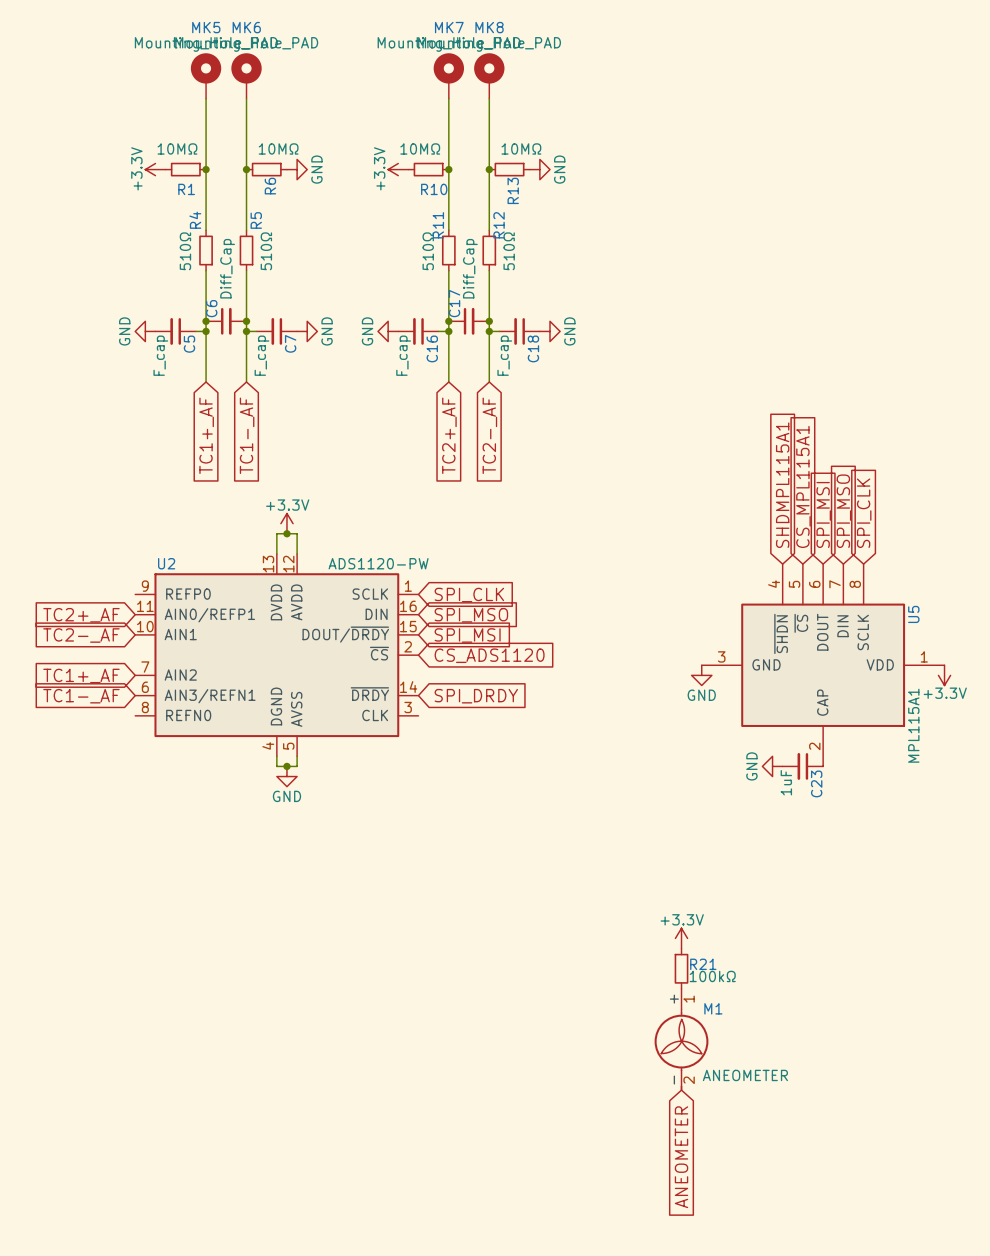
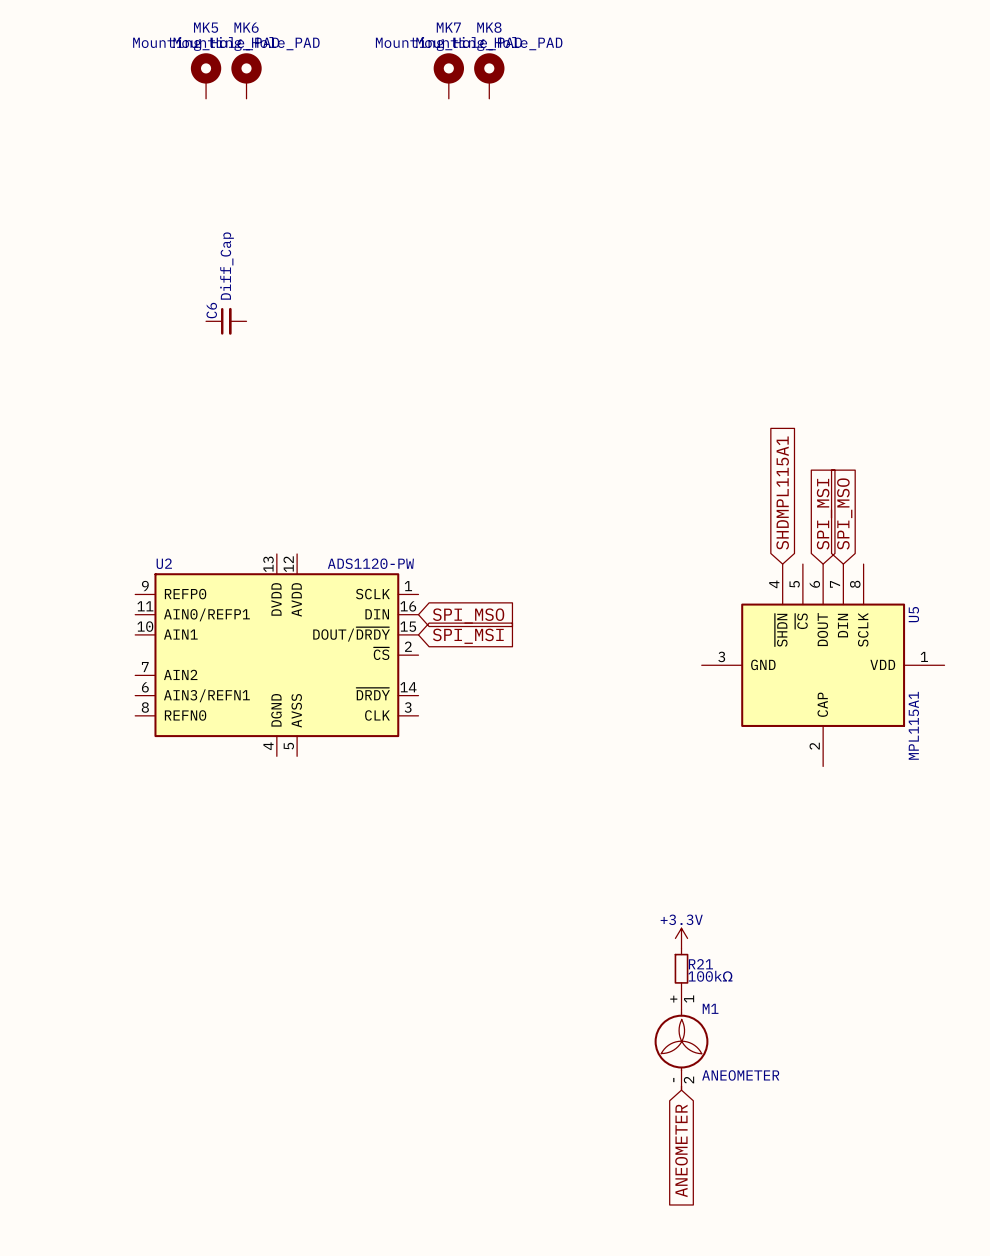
wire: (206, 98) (206, 230) -> none
wire: (246, 98) (246, 230) -> none
wire: (448, 98) (448, 230) -> none
wire: (489, 98) (489, 230) -> none
power symbol: +3.3V (155, 169) -> none
R1: 10MΩ (185, 169) -> none
junction: (206, 169) -> none
junction: (246, 169) -> none
R6: 10MΩ (266, 169) -> none
power symbol: GND (297, 169) -> none
power symbol: +3.3V (398, 169) -> none
R10: 10MΩ (428, 169) -> none
junction: (448, 169) -> none
junction: (489, 169) -> none
R13: 10MΩ (509, 169) -> none
power symbol: GND (539, 169) -> none
R4: 510Ω (206, 250) -> none
R5: 510Ω (246, 250) -> none
R11: 510Ω (448, 250) -> none
R12: 510Ω (489, 250) -> none
wire: (206, 270) (206, 382) -> none
wire: (246, 270) (246, 382) -> none
wire: (448, 270) (448, 382) -> none
wire: (489, 270) (489, 382) -> none
junction: (206, 321) -> none
junction: (246, 321) -> none
junction: (448, 321) -> none
C17: Diff_Cap (469, 321) -> none
junction: (489, 321) -> none
power symbol: GND (145, 331) -> none
C5: F_cap (175, 331) -> none
wire: (195, 331) (206, 331) -> none
junction: (206, 331) -> none
wire: (246, 331) (256, 331) -> none
junction: (246, 331) -> none
C7: F_cap (276, 331) -> none
power symbol: GND (307, 331) -> none
power symbol: GND (388, 331) -> none
C16: F_cap (418, 331) -> none
wire: (438, 331) (448, 331) -> none
junction: (448, 331) -> none
wire: (489, 331) (499, 331) -> none
junction: (489, 331) -> none
C18: F_cap (519, 331) -> none
power symbol: GND (549, 331) -> none
global label: TC1+_AF (206, 435) -> none
global label: TC1-_AF (247, 435) -> none
global label: TC2+_AF (449, 435) -> none
global label: TC2-_AF (489, 435) -> none
global label: CS_MPL115A1 (803, 486) -> none
global label: SPI_CLK (864, 513) -> none
power symbol: +3.3V (286, 523) -> none
junction: (286, 533) -> none
wire: (276, 553) (276, 533) (297, 533) (297, 553) -> none
global label: SPI_CLK (469, 595) -> none
global label: TC2+_AF (81, 615) -> none
global label: TC2-_AF (81, 635) -> none
global label: CS_ADS1120 (489, 655) -> none
global label: TC1+_AF (81, 675) -> none
power symbol: GND (701, 675) -> none
power symbol: +3.3V (944, 675) -> none
global label: TC1-_AF (81, 696) -> none
global label: SPI_DRDY (476, 696) -> none
wire: (276, 756) (276, 766) (297, 766) (297, 756) -> none
junction: (286, 766) -> none
power symbol: GND (772, 766) -> none
C23: 1uF (802, 766) -> none
power symbol: GND (286, 776) -> none

